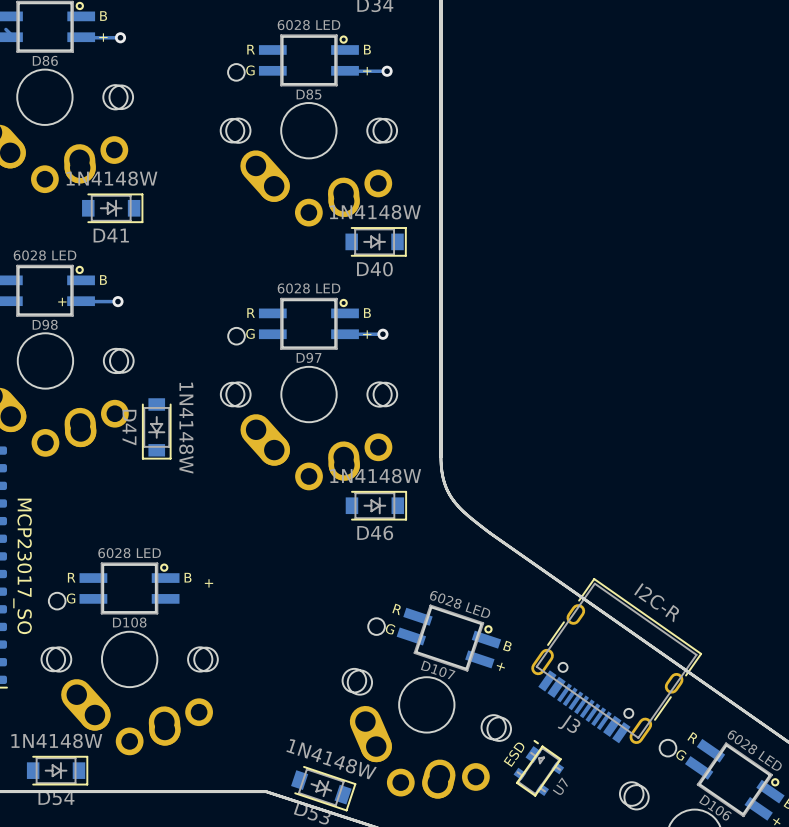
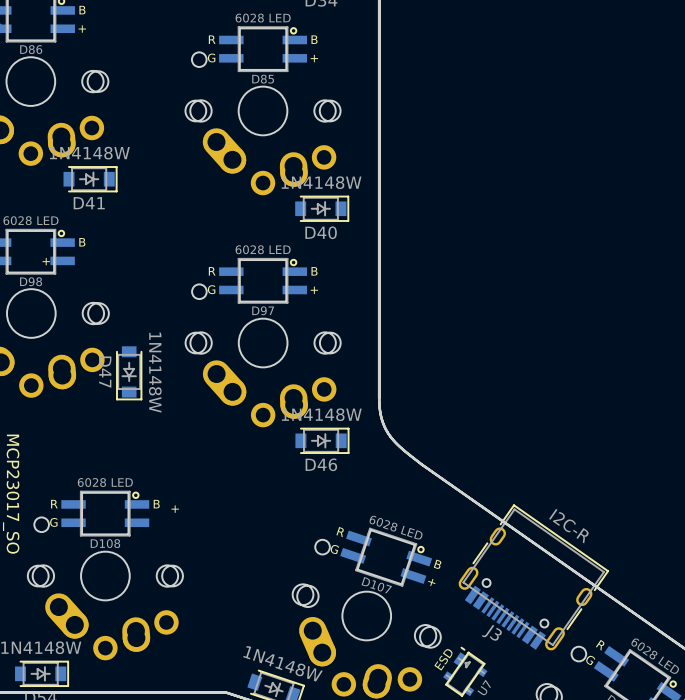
track: (81, 37) (120, 37) -> none
via: (120, 37) -> none
track: (345, 70) (387, 71) -> none
via: (387, 71) -> none
track: (81, 301) (118, 301) -> none
via: (118, 301) -> none
track: (382, 334) (345, 334) -> none
via: (382, 334) -> none

